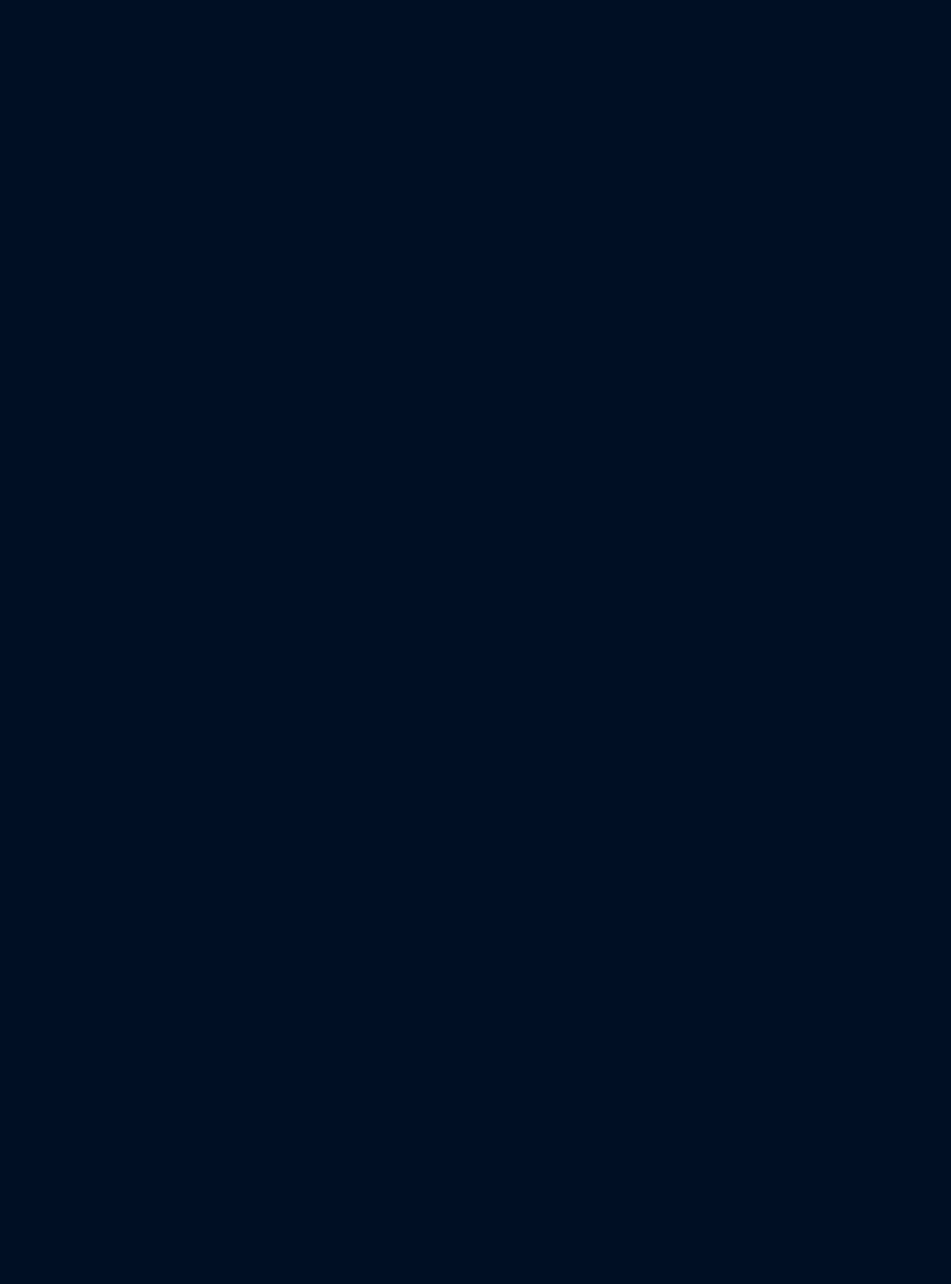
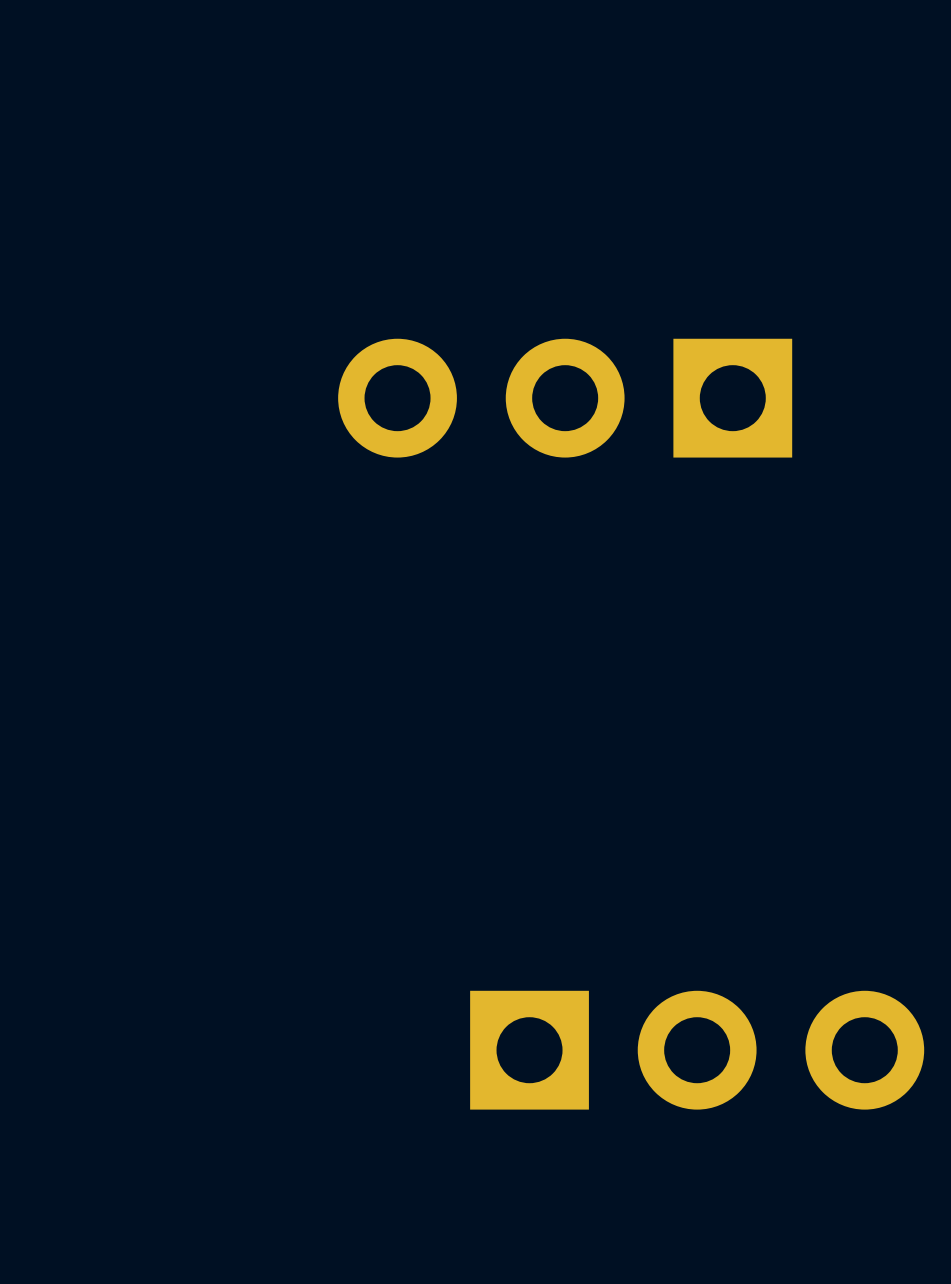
part: none -> (565, 398)
part: none -> (697, 1050)

